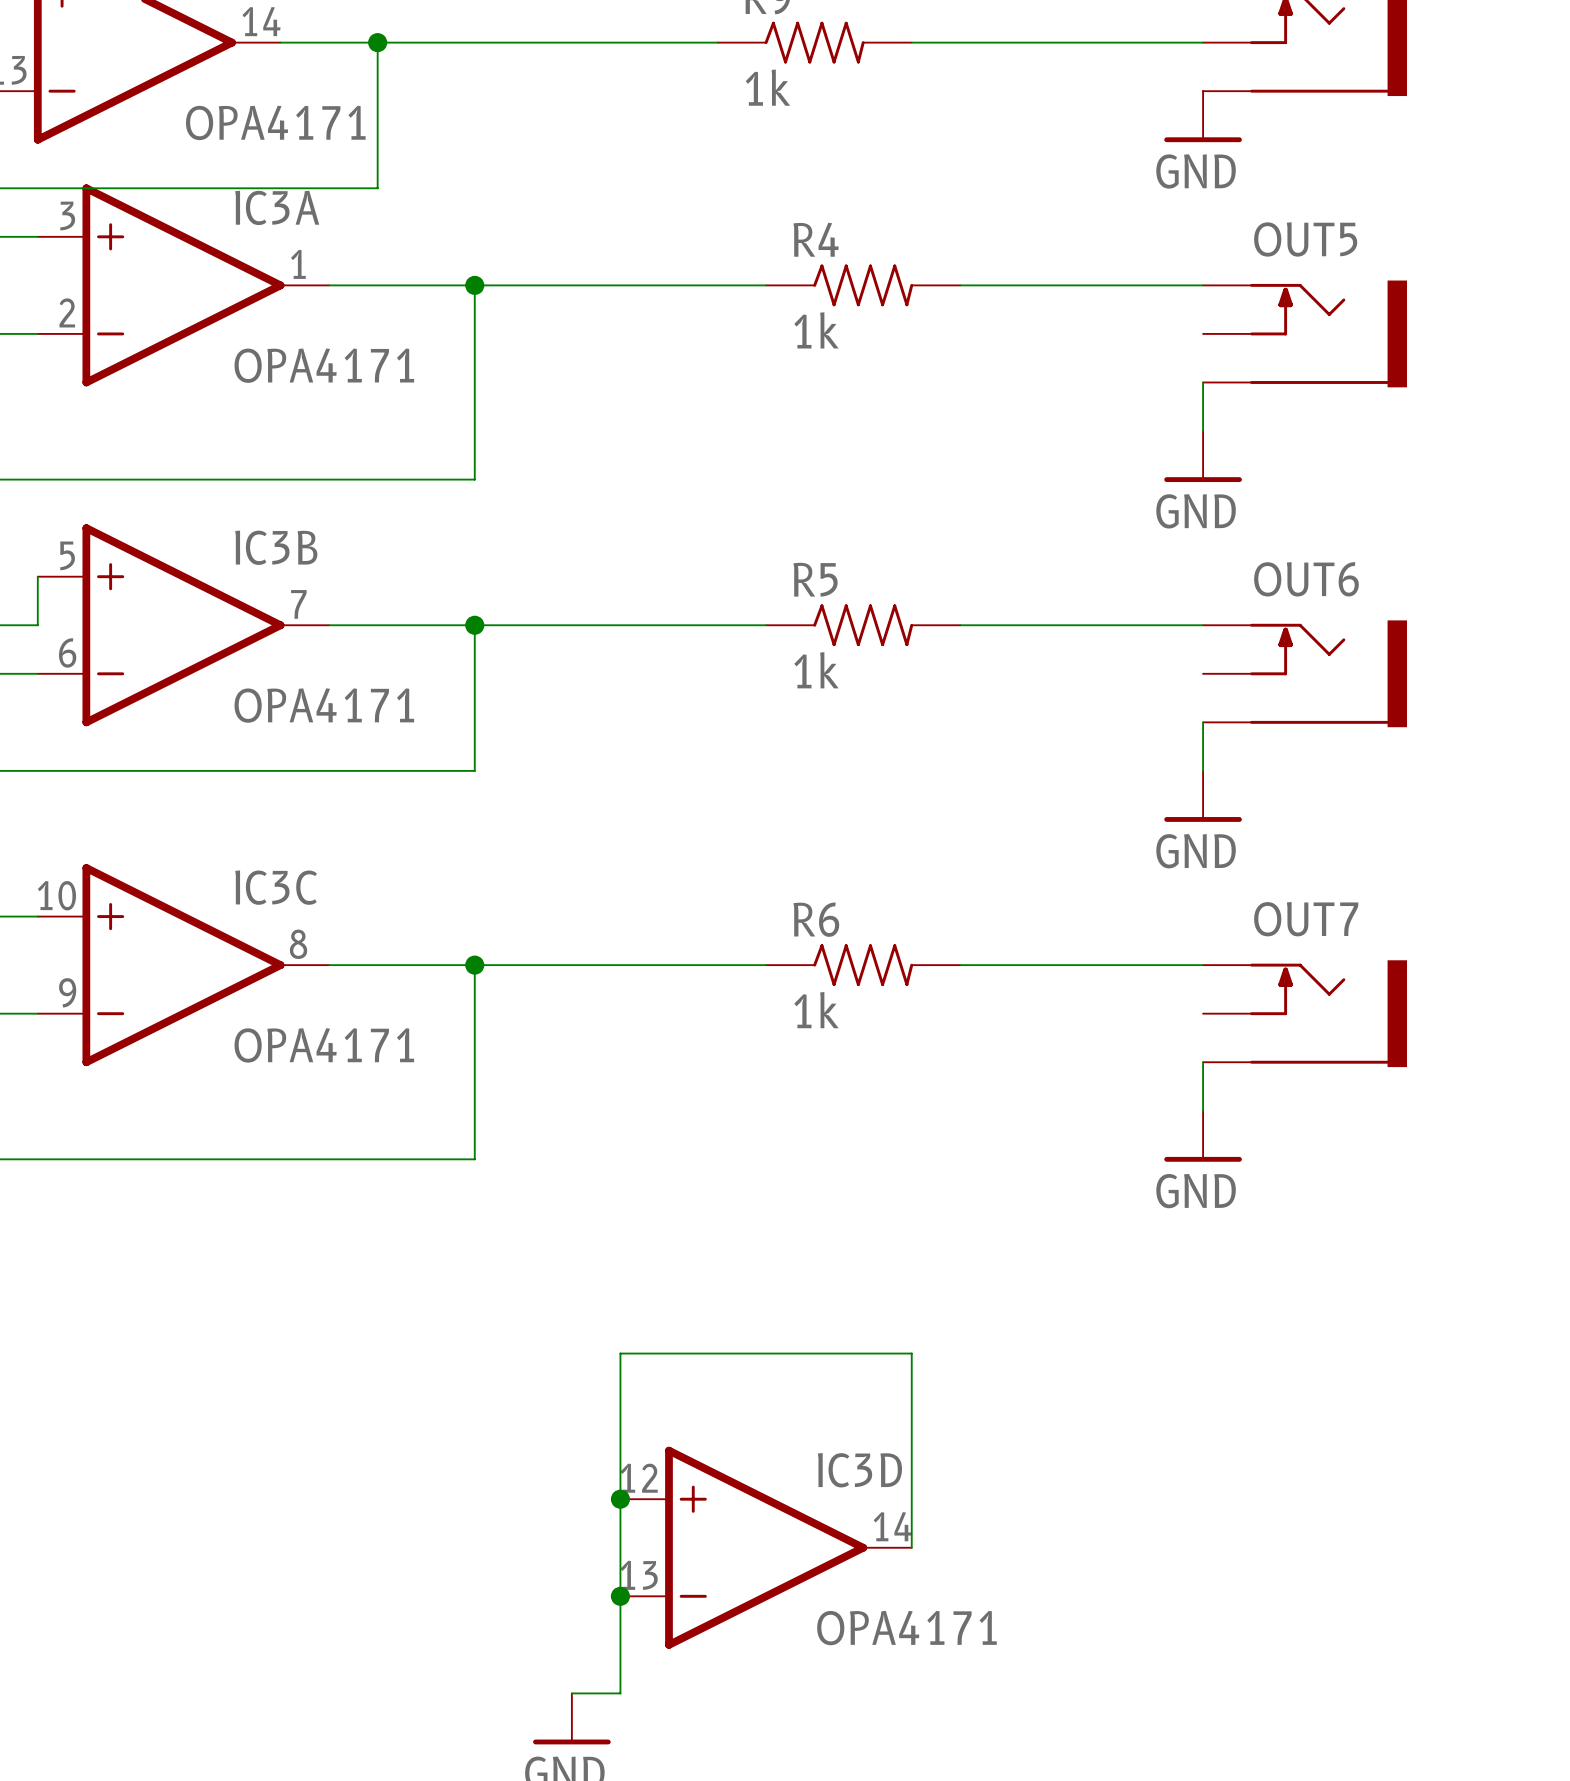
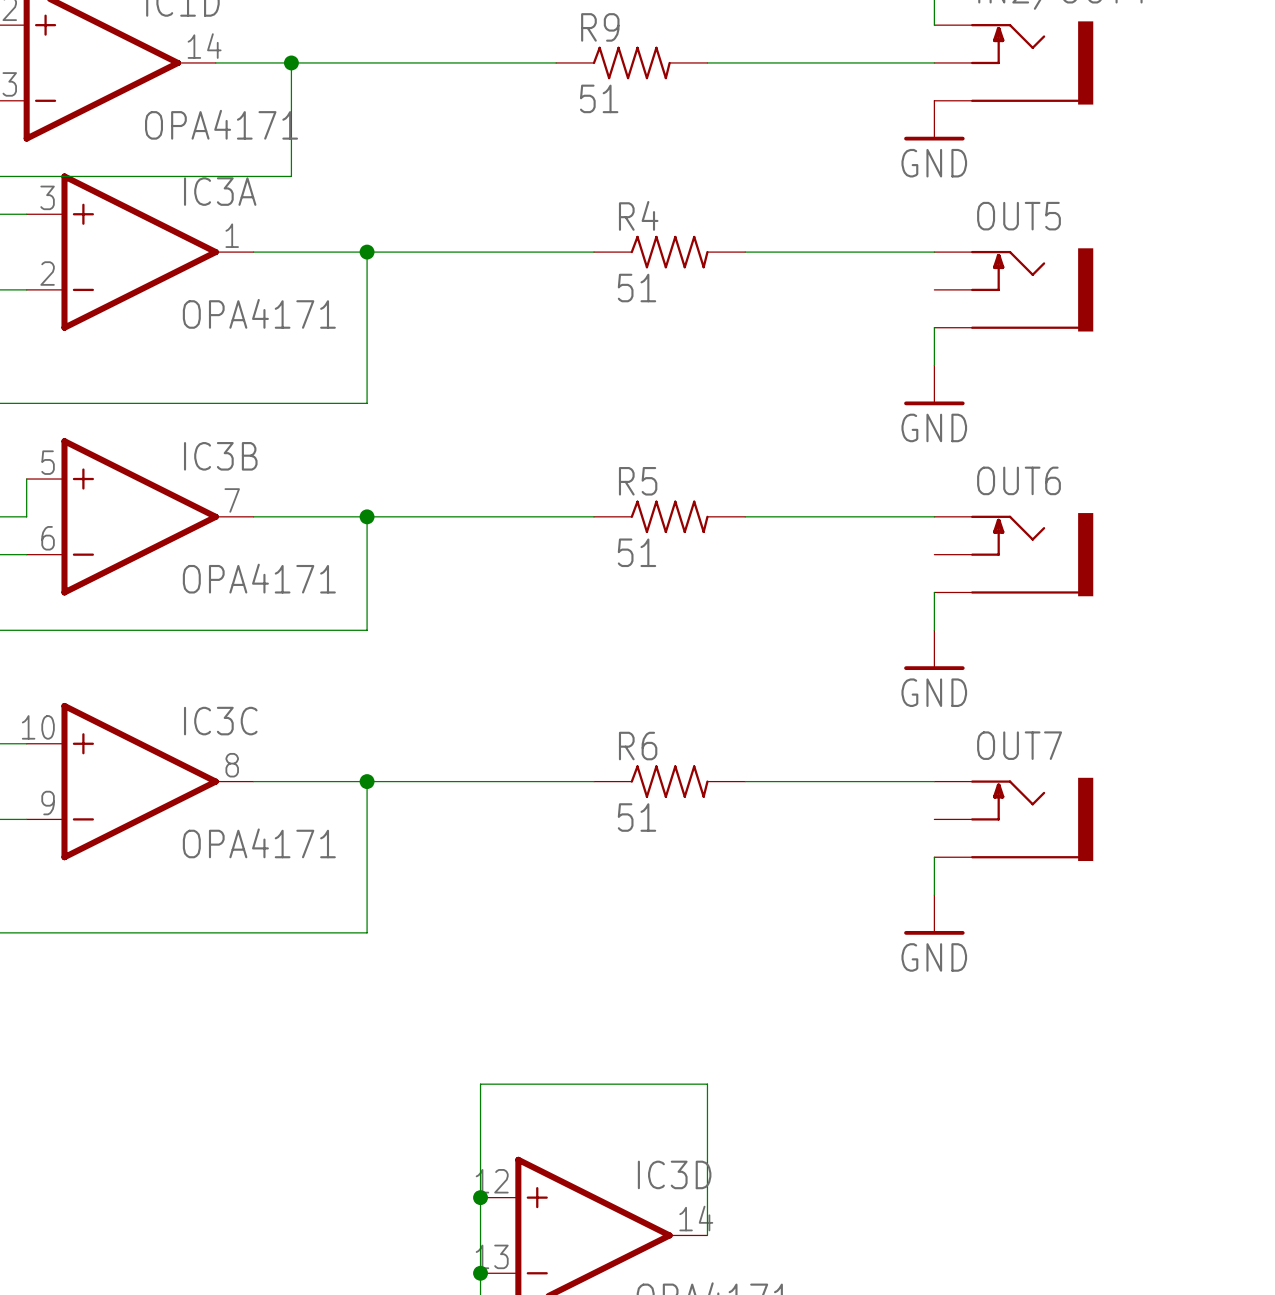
R9 value: 1k (767, 87) -> 51 (599, 98)
R4 value: 1k (816, 330) -> 51 (636, 288)
R5 value: 1k (816, 670) -> 51 (636, 552)
R6 value: 1k (816, 1010) -> 51 (636, 817)

